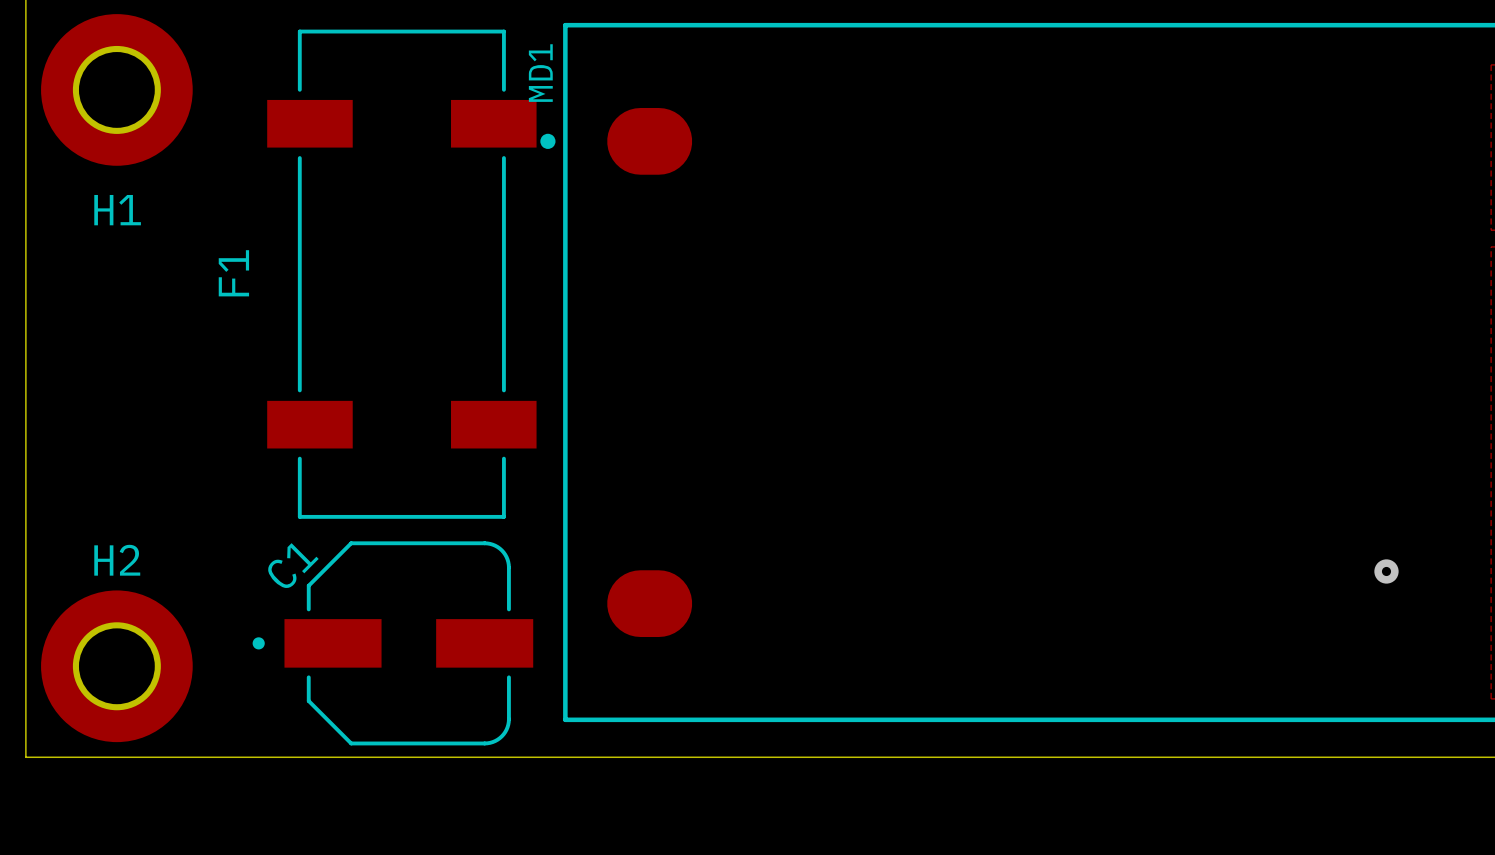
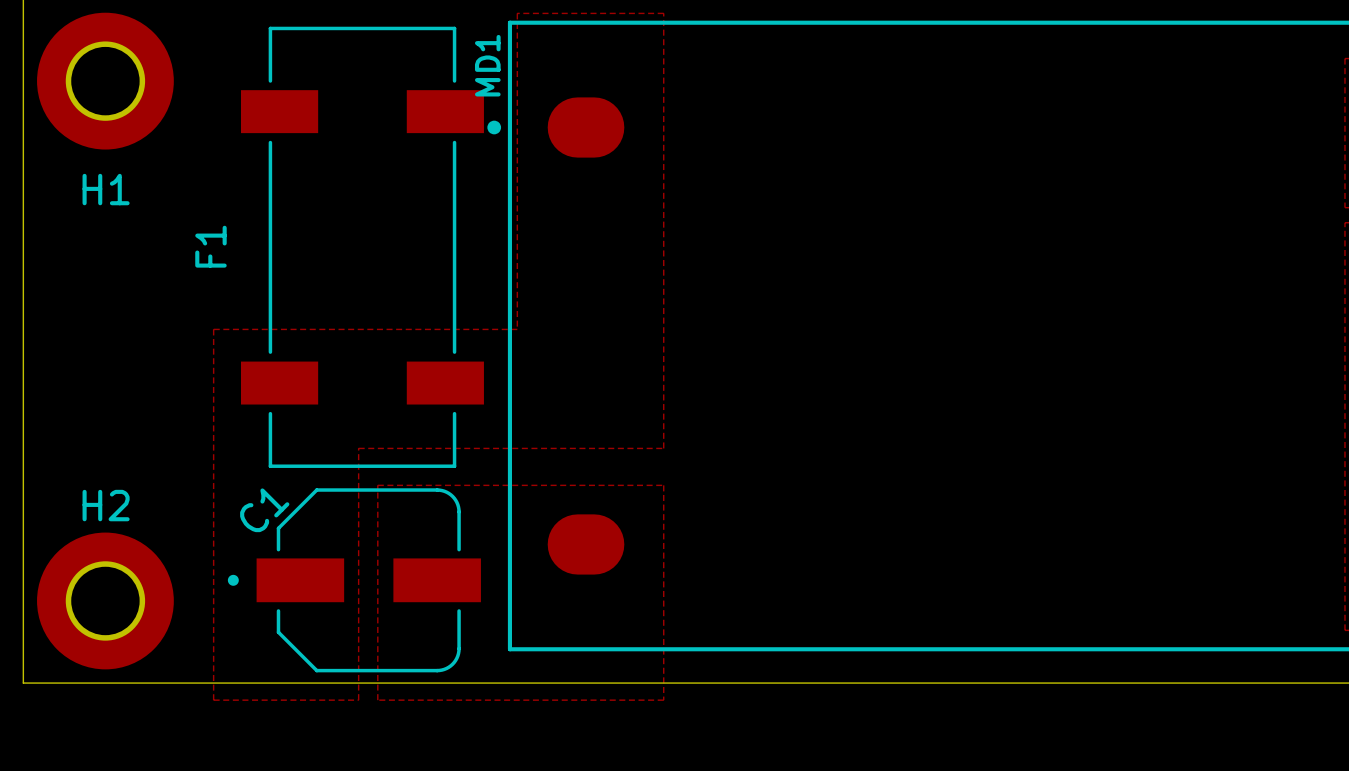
zone outline: none -> (517, 13) (663, 13) (663, 448) (358, 448) (358, 700) (213, 700) (213, 329) (517, 329) (517, 13)
zone outline: none -> (377, 485) (377, 700) (663, 700) (663, 485) (377, 485)
via: (1386, 571) -> none

